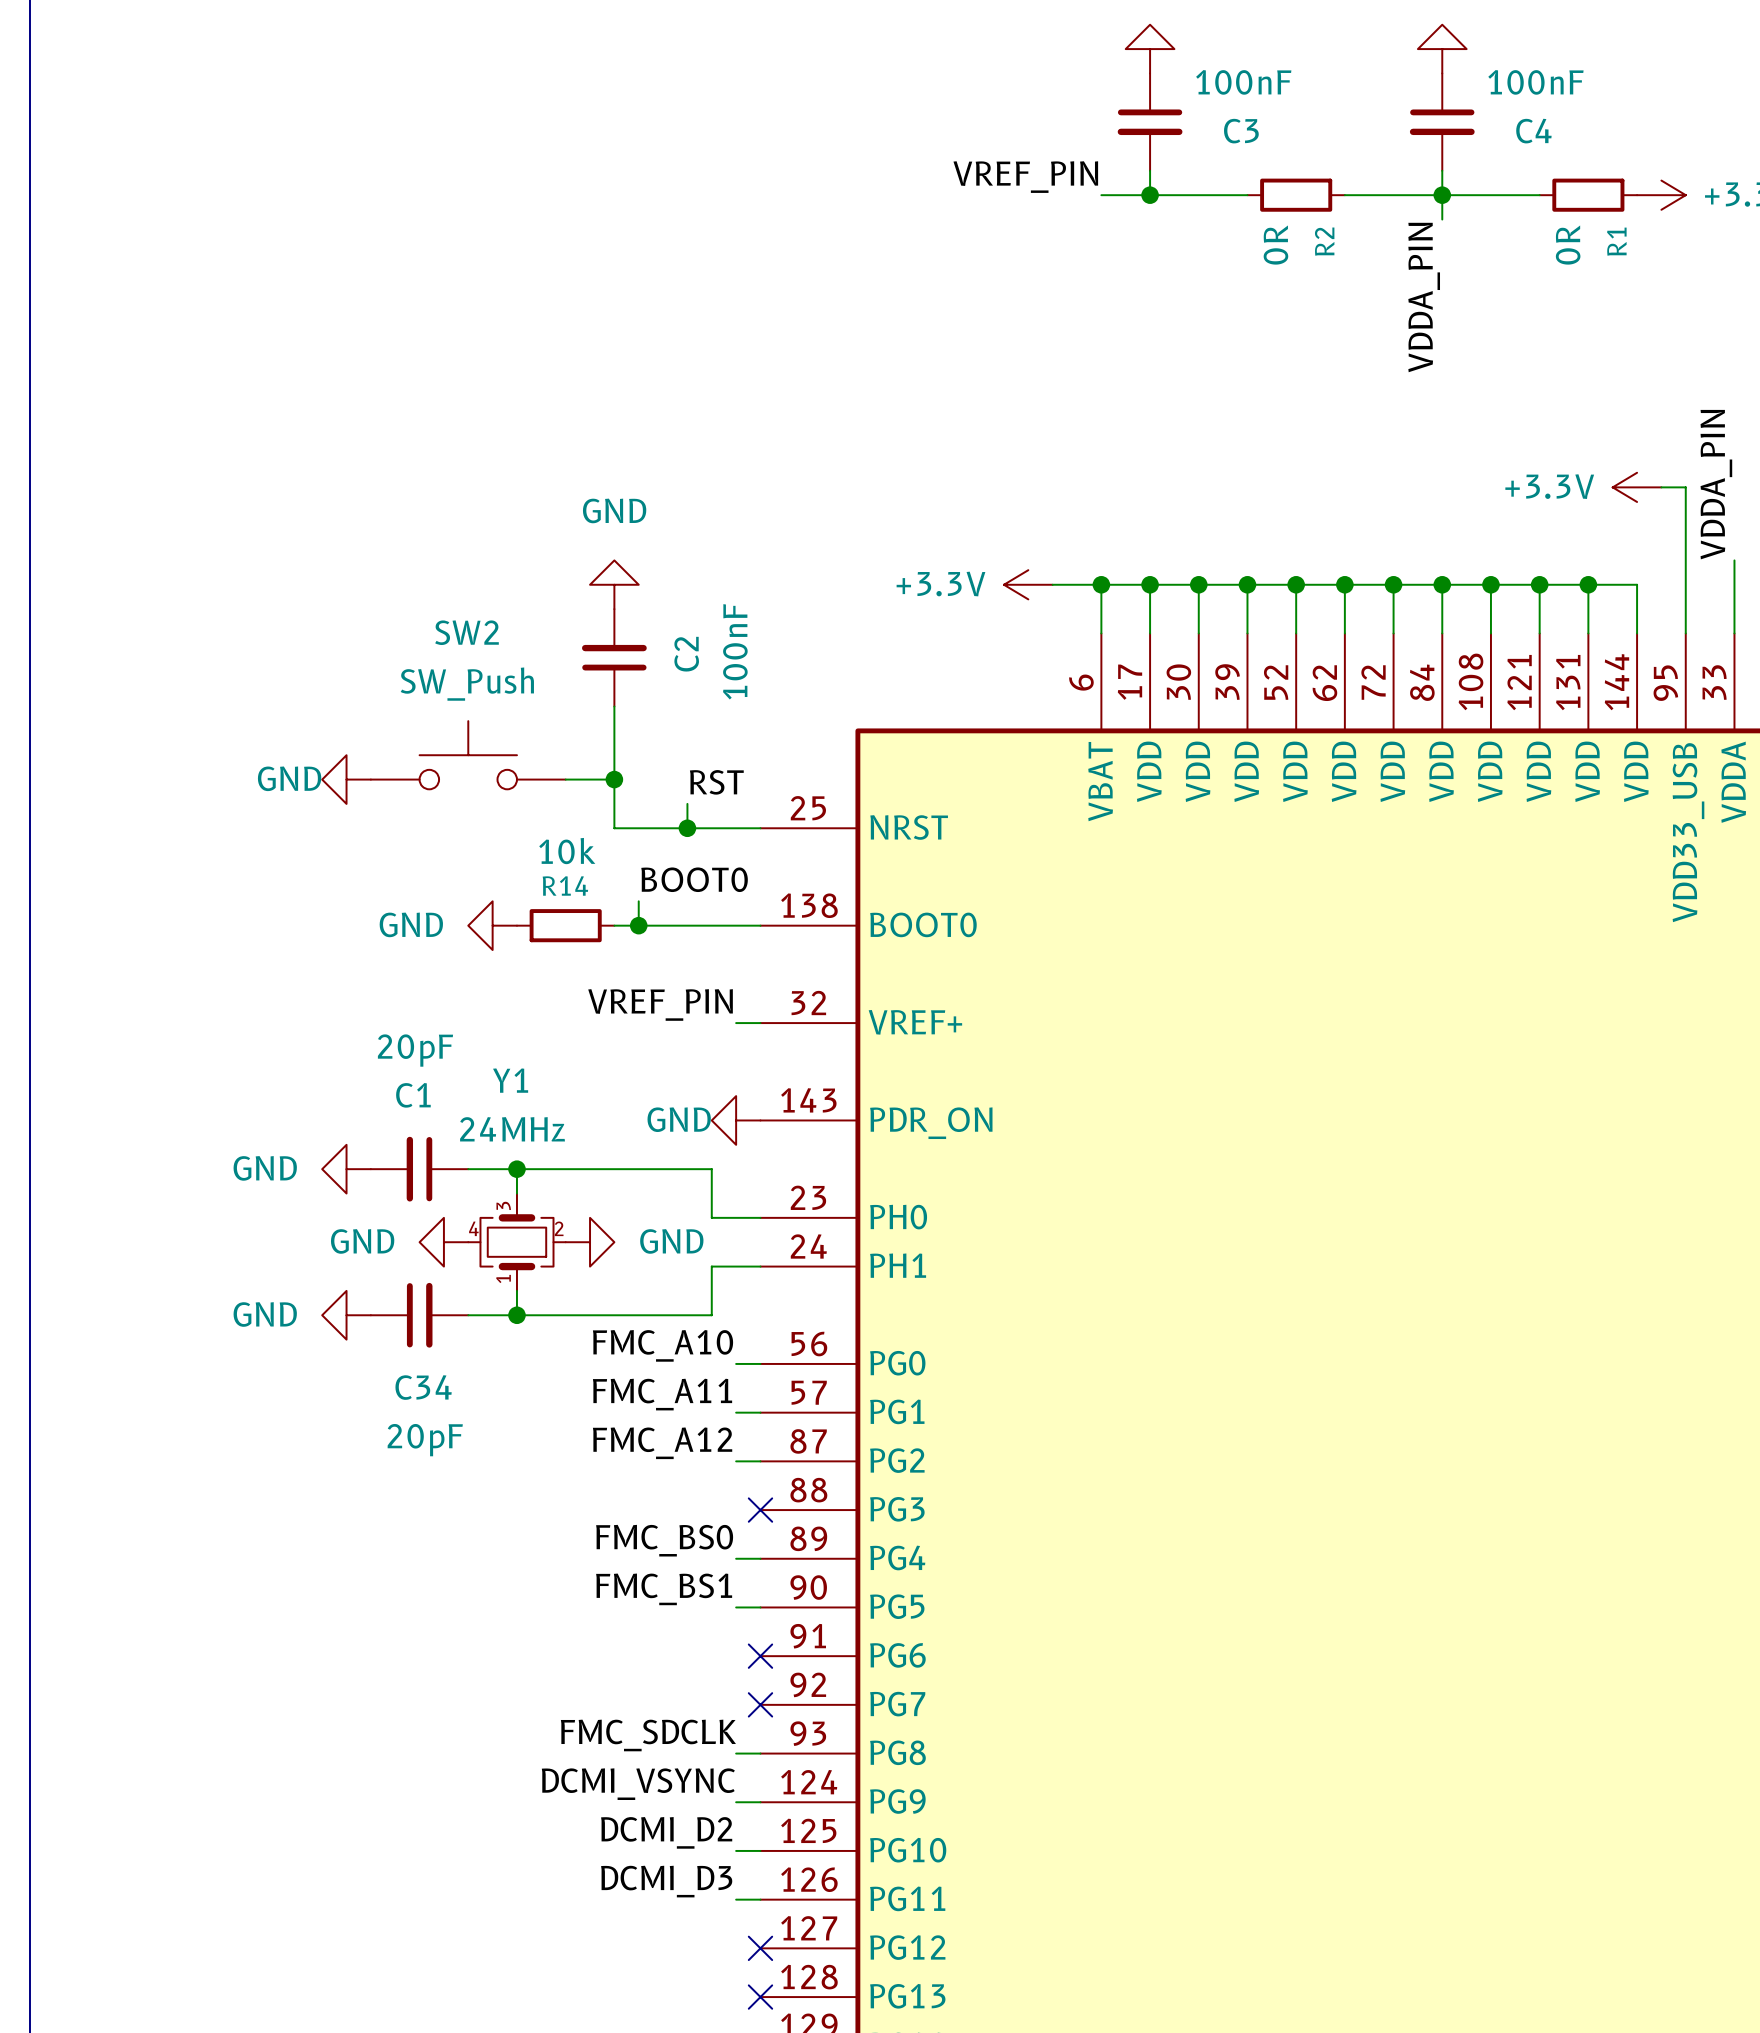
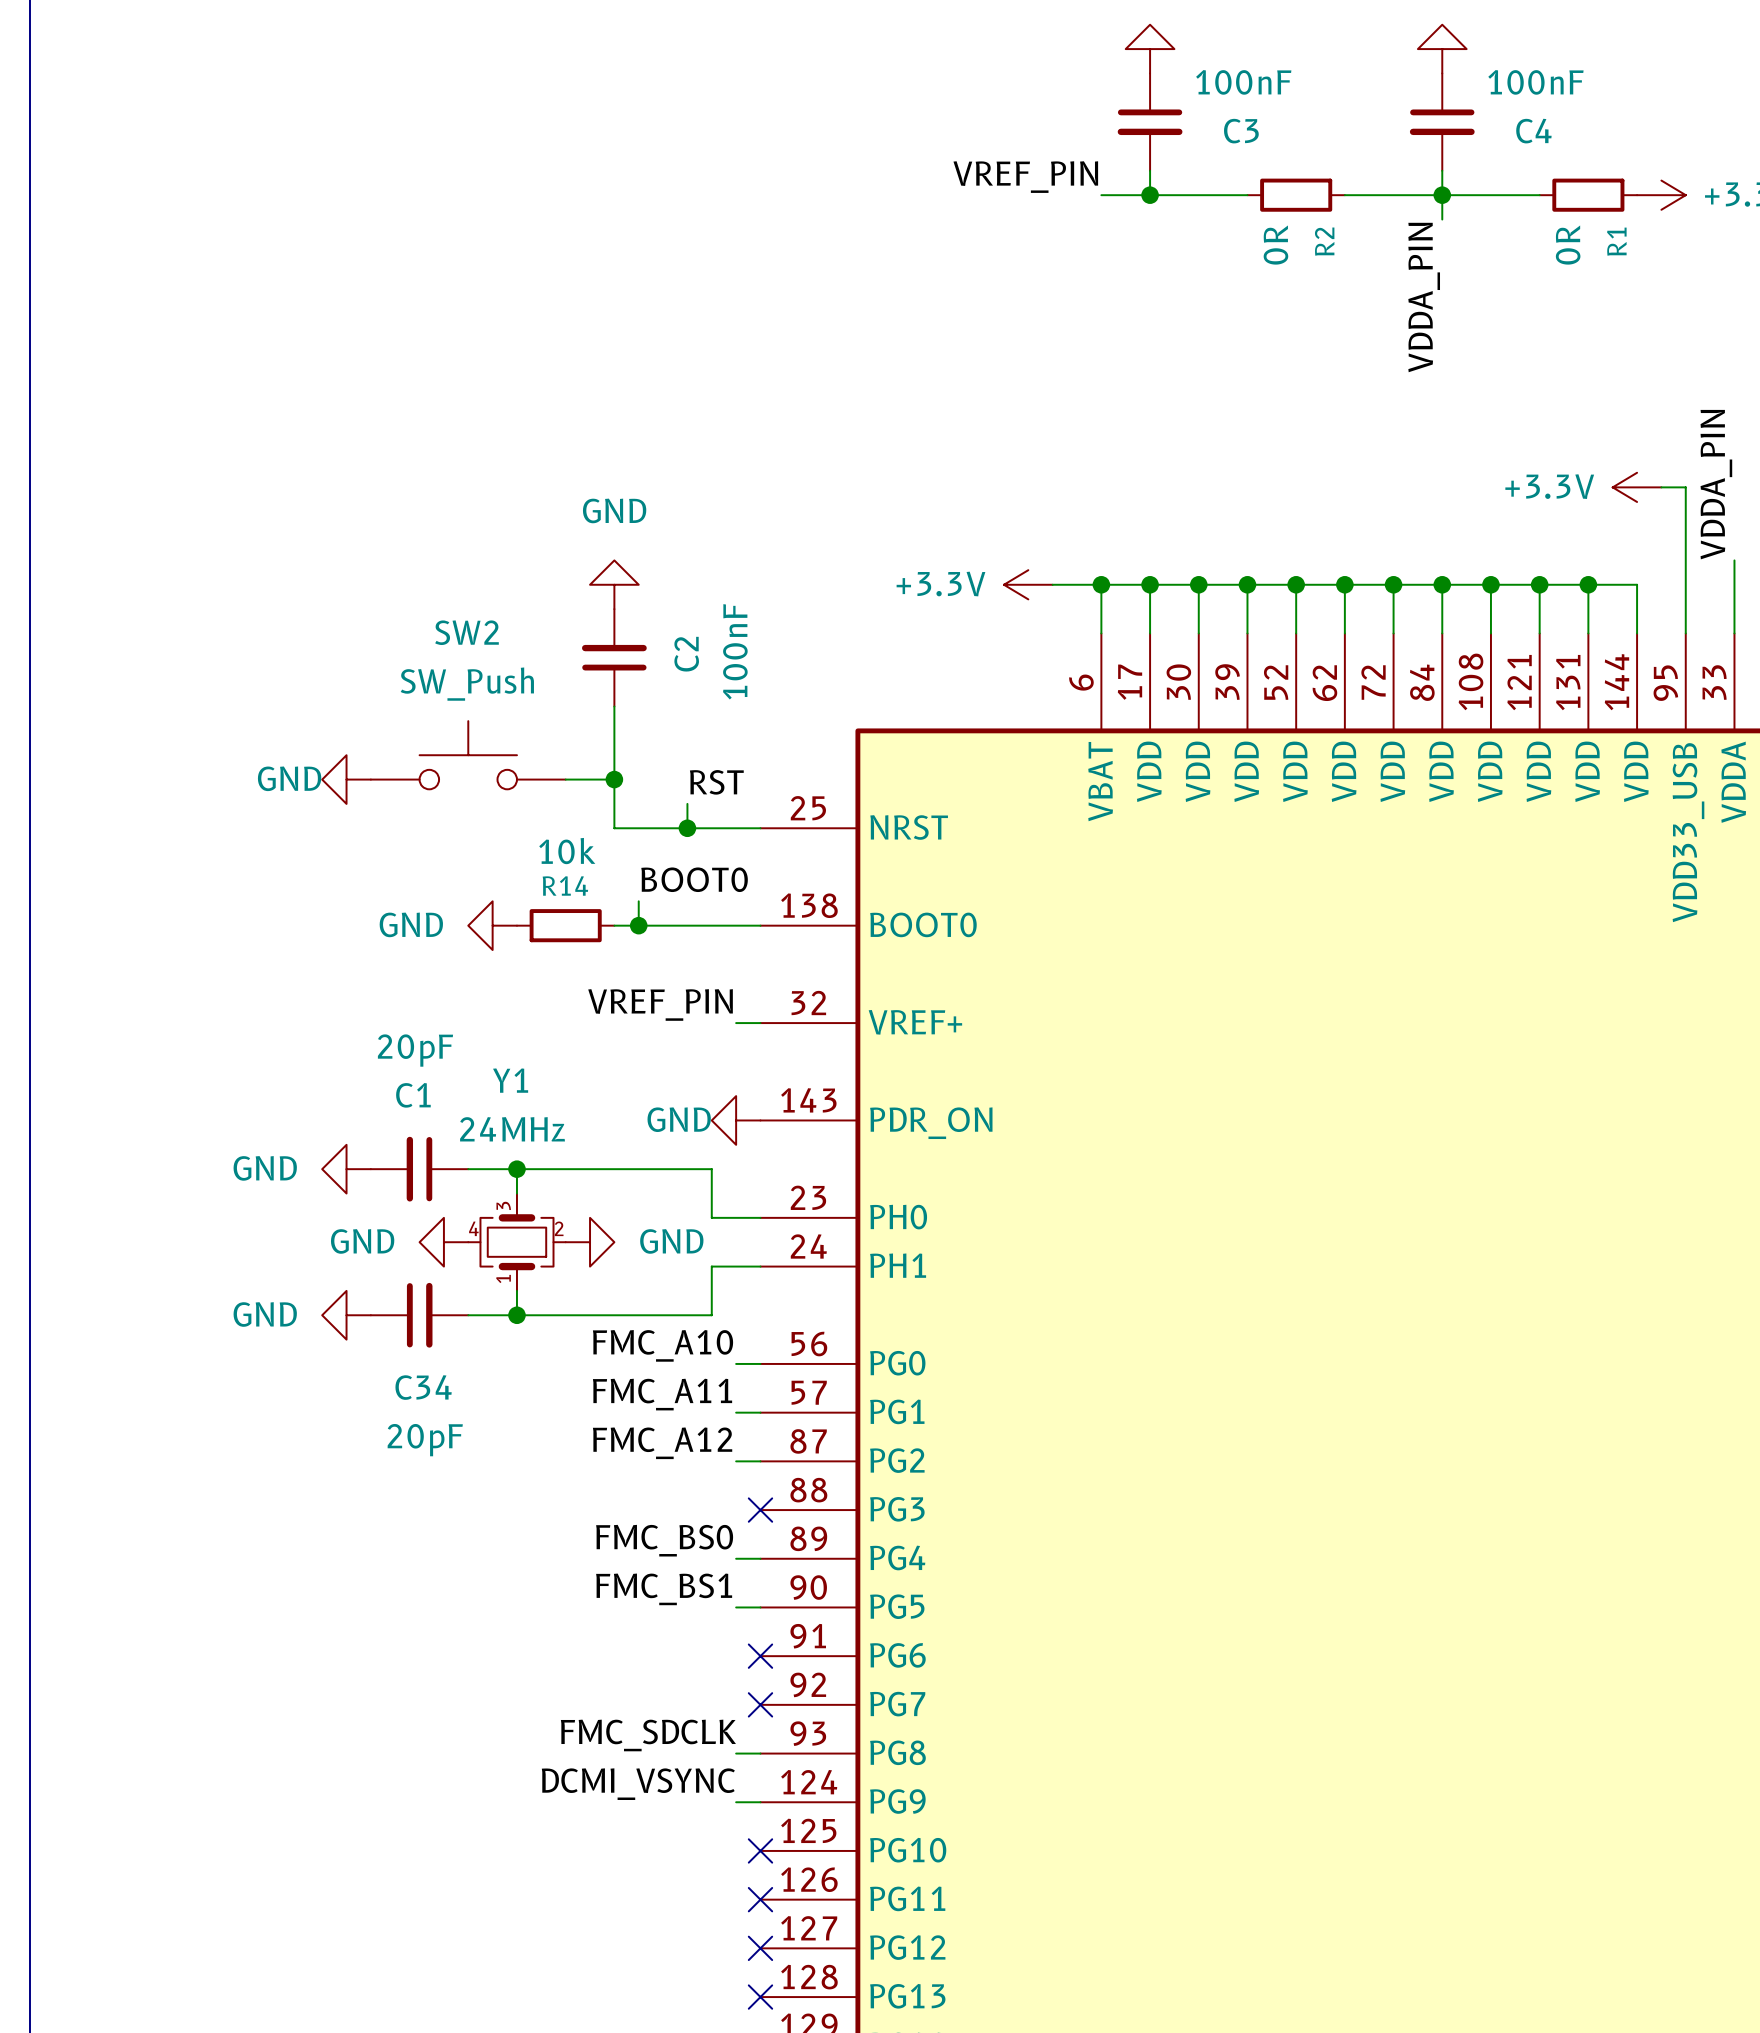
label: DCMI_D2 (666, 1832) -> none
wire: (736, 1850) (760, 1850) -> none
no-connect mark: none -> (760, 1850)
label: DCMI_D3 (666, 1881) -> none
wire: (736, 1899) (760, 1899) -> none
no-connect mark: none -> (760, 1899)

